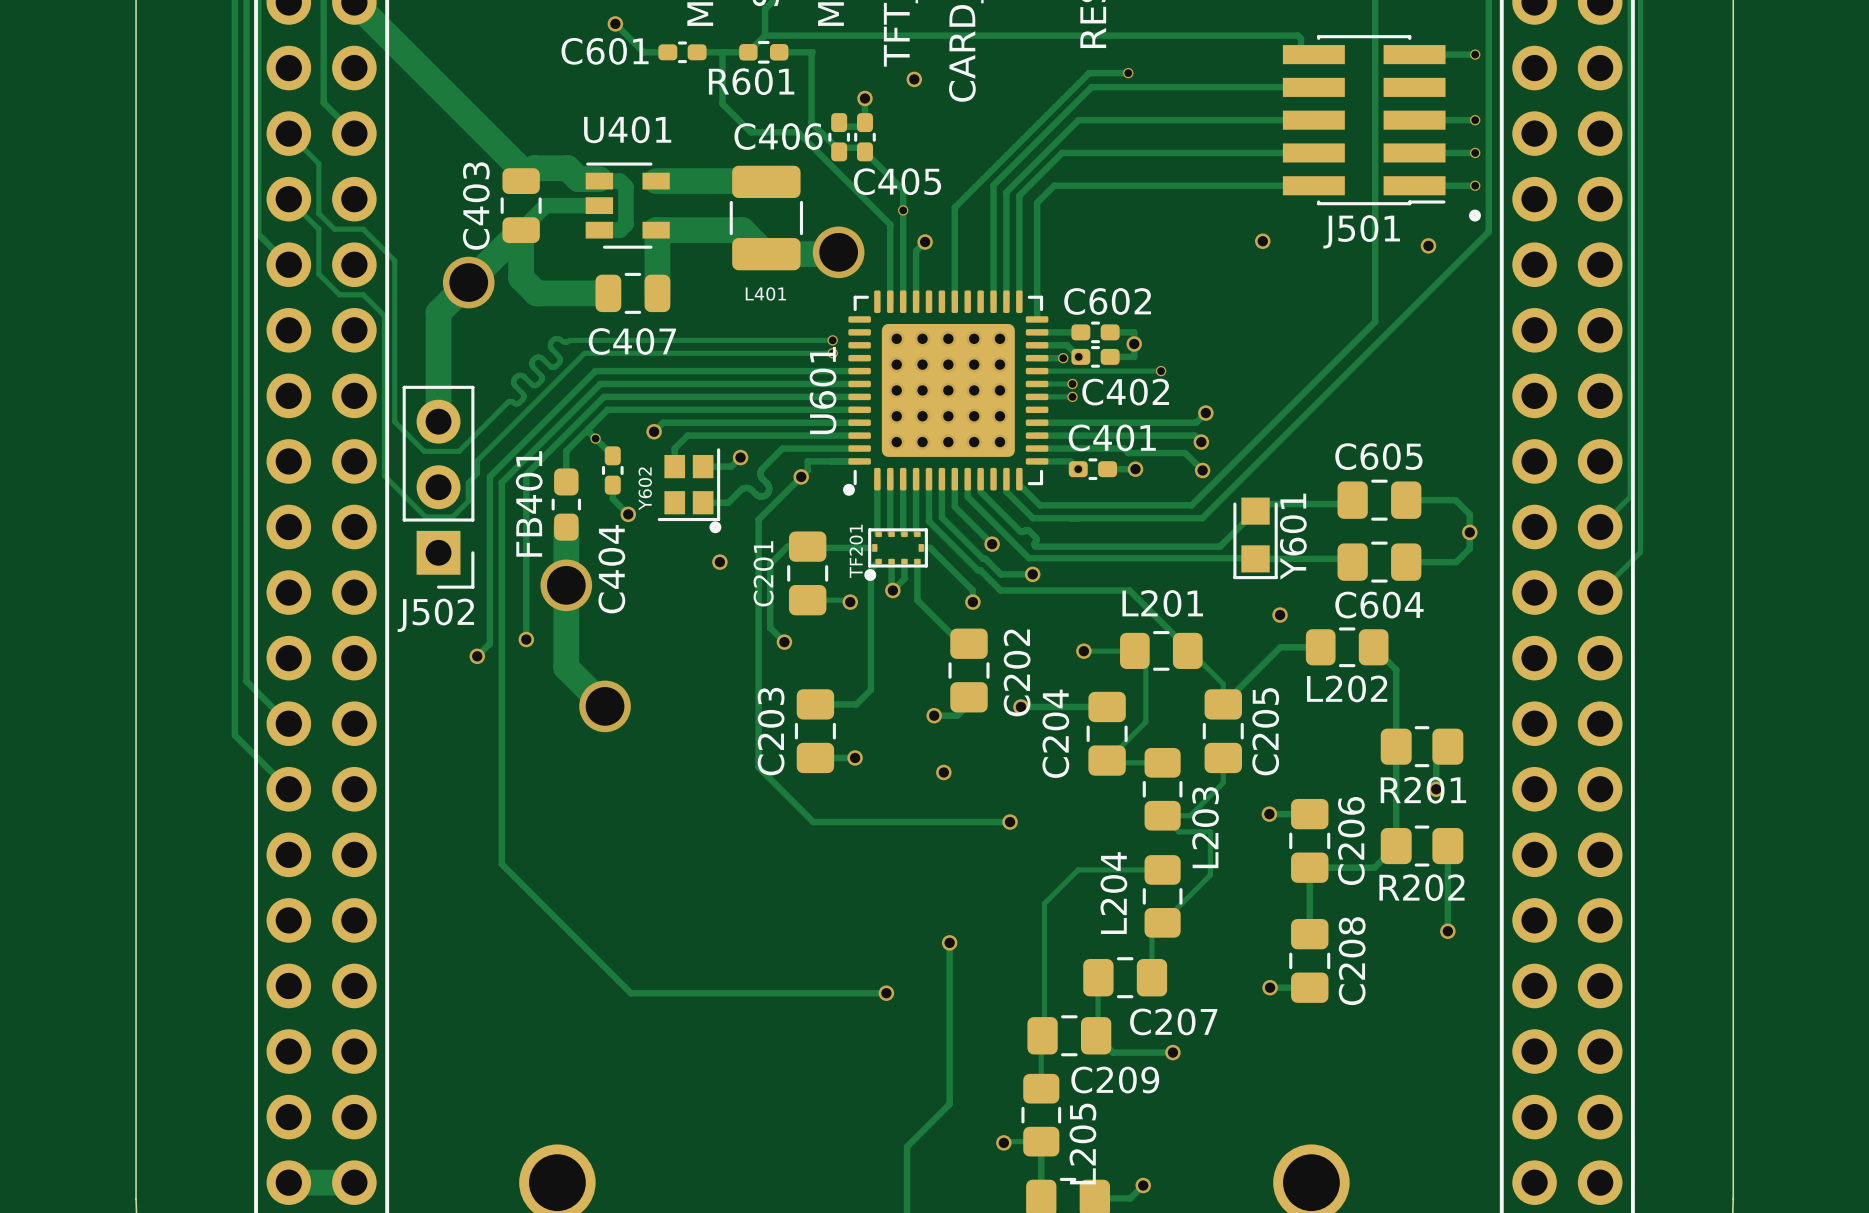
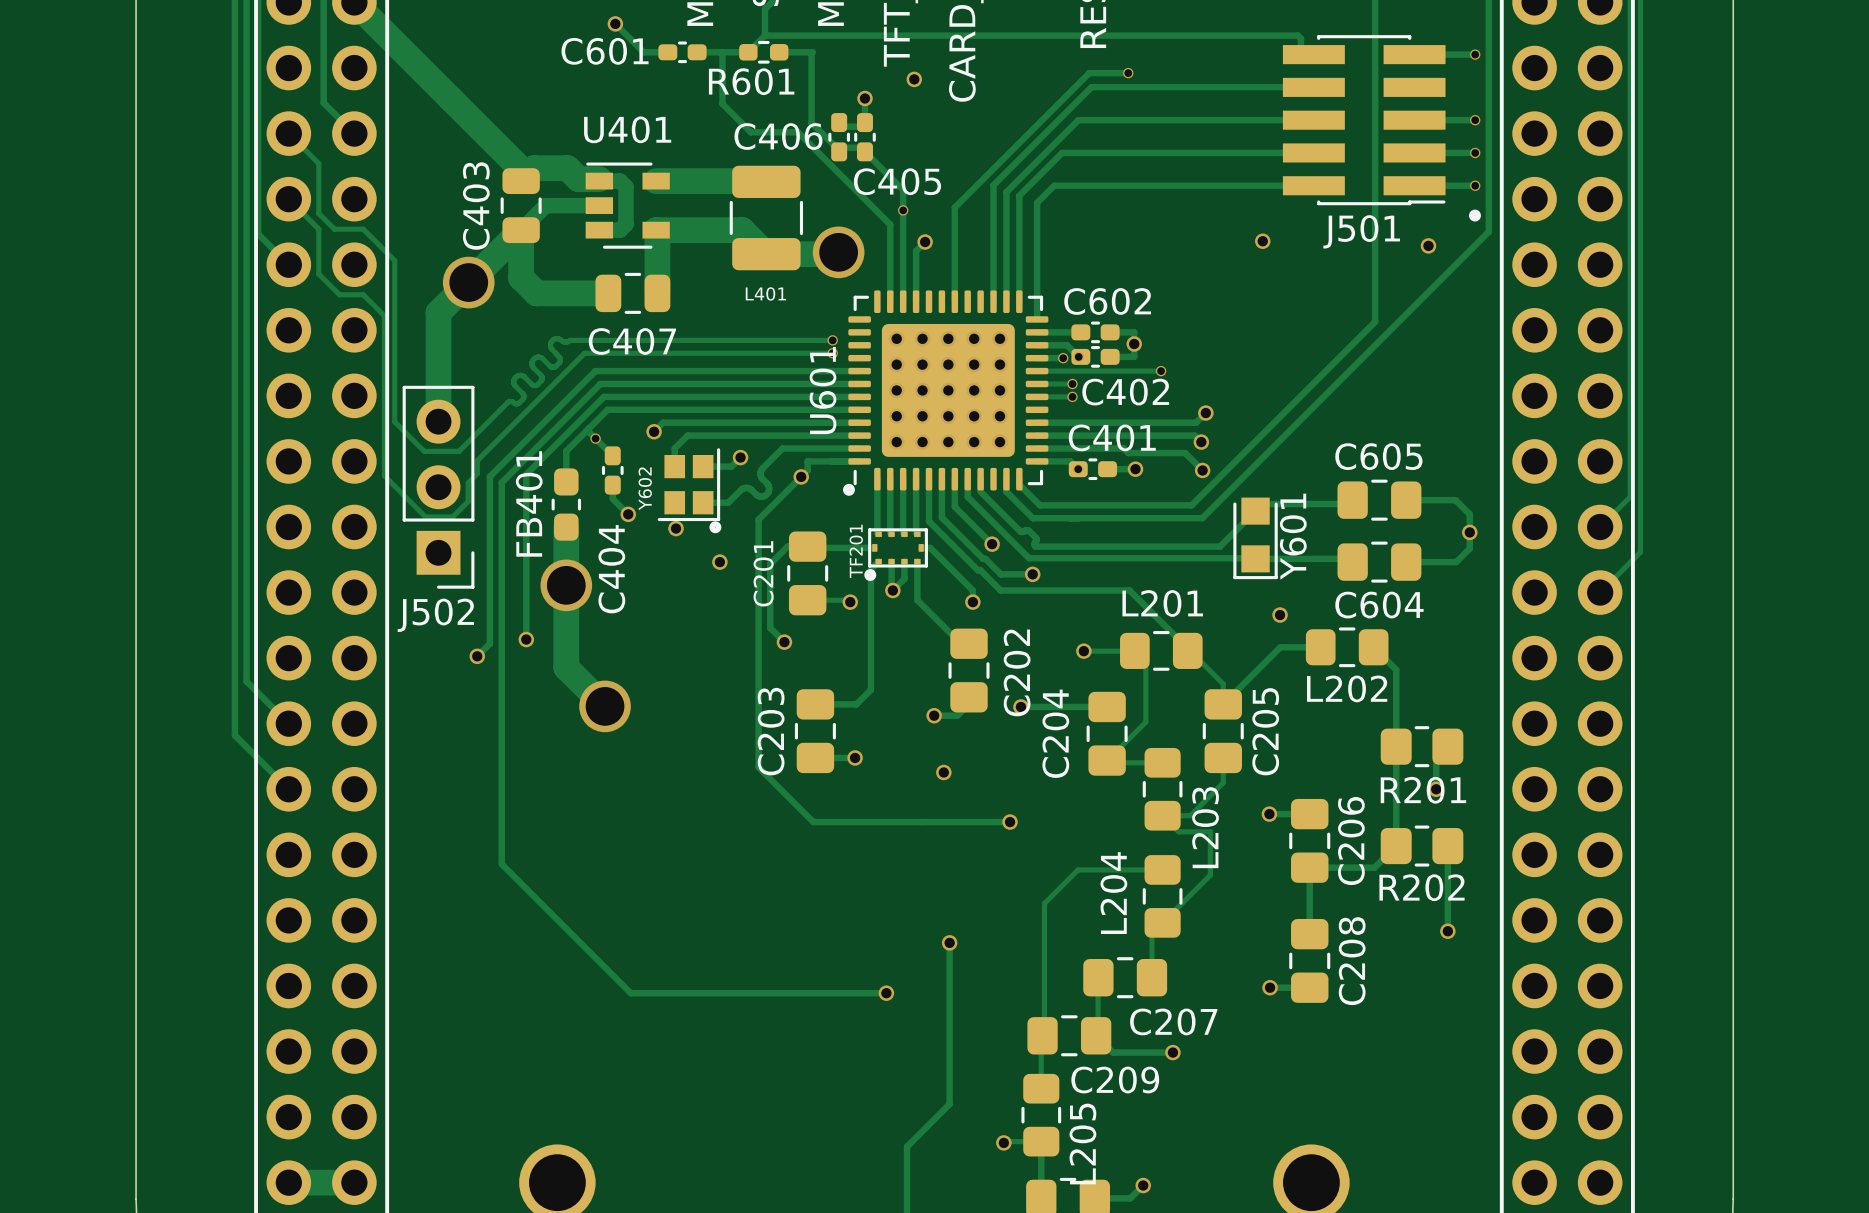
via: none -> (676, 528)

